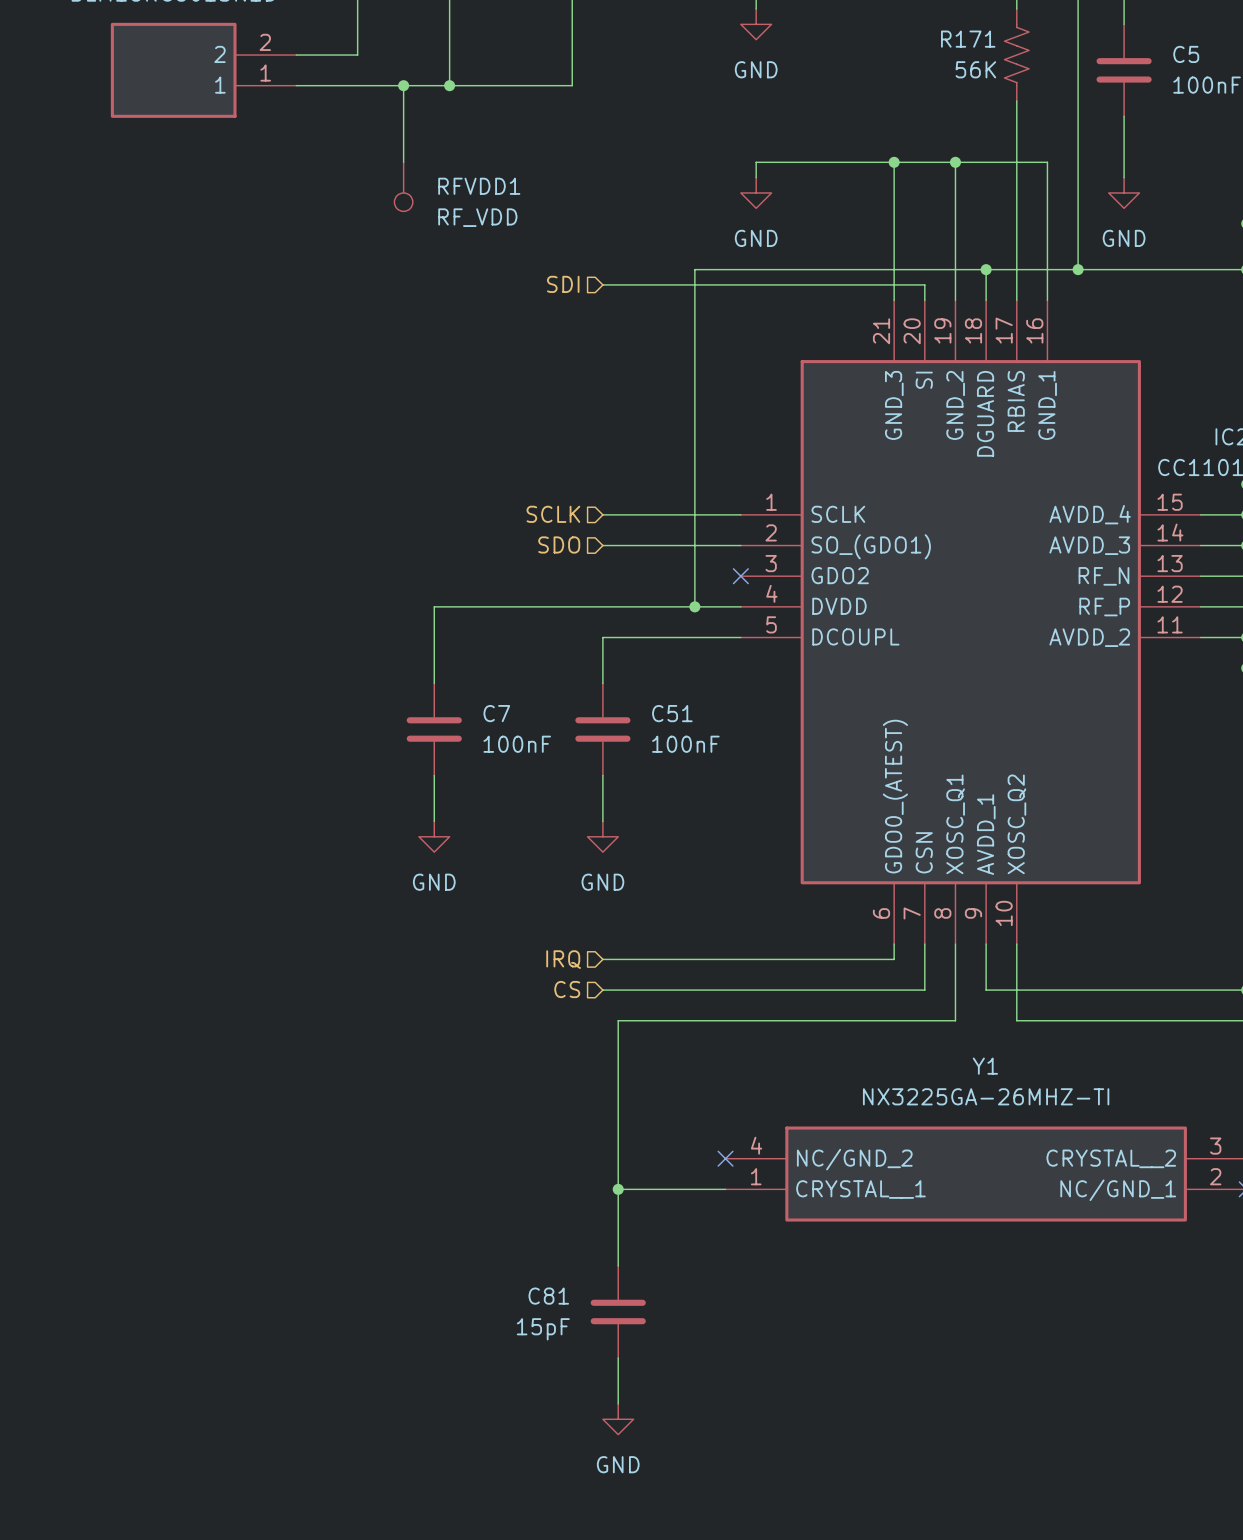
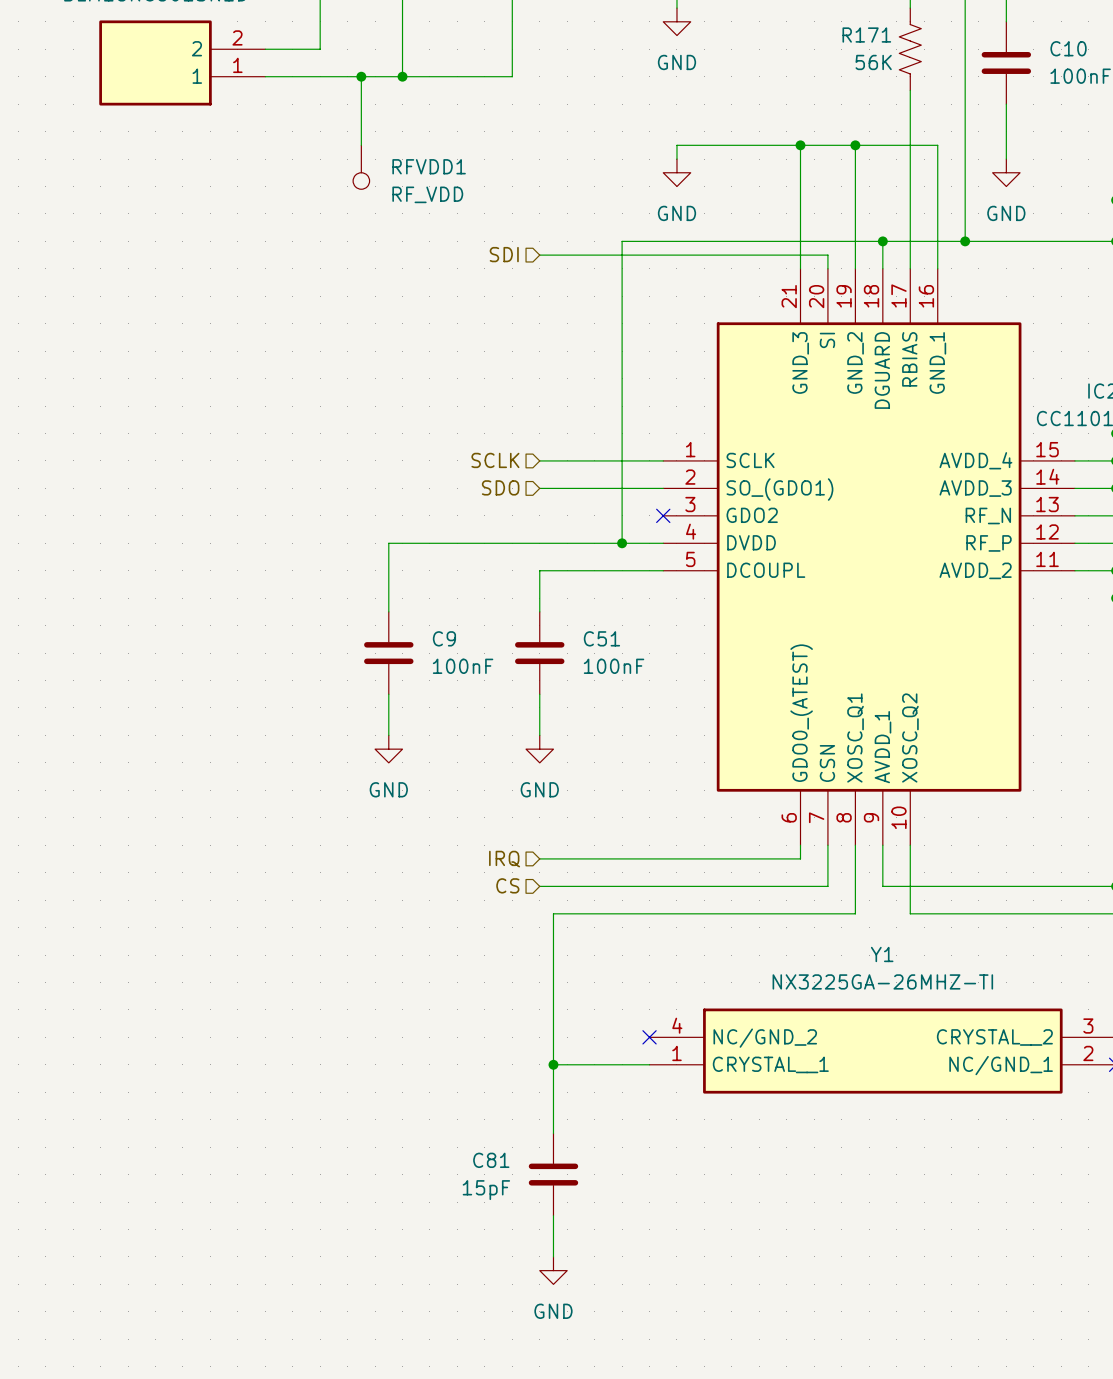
C5 name: C5 (1186, 54) -> C10 (1068, 48)
C7 name: C7 (496, 713) -> C9 (444, 638)

